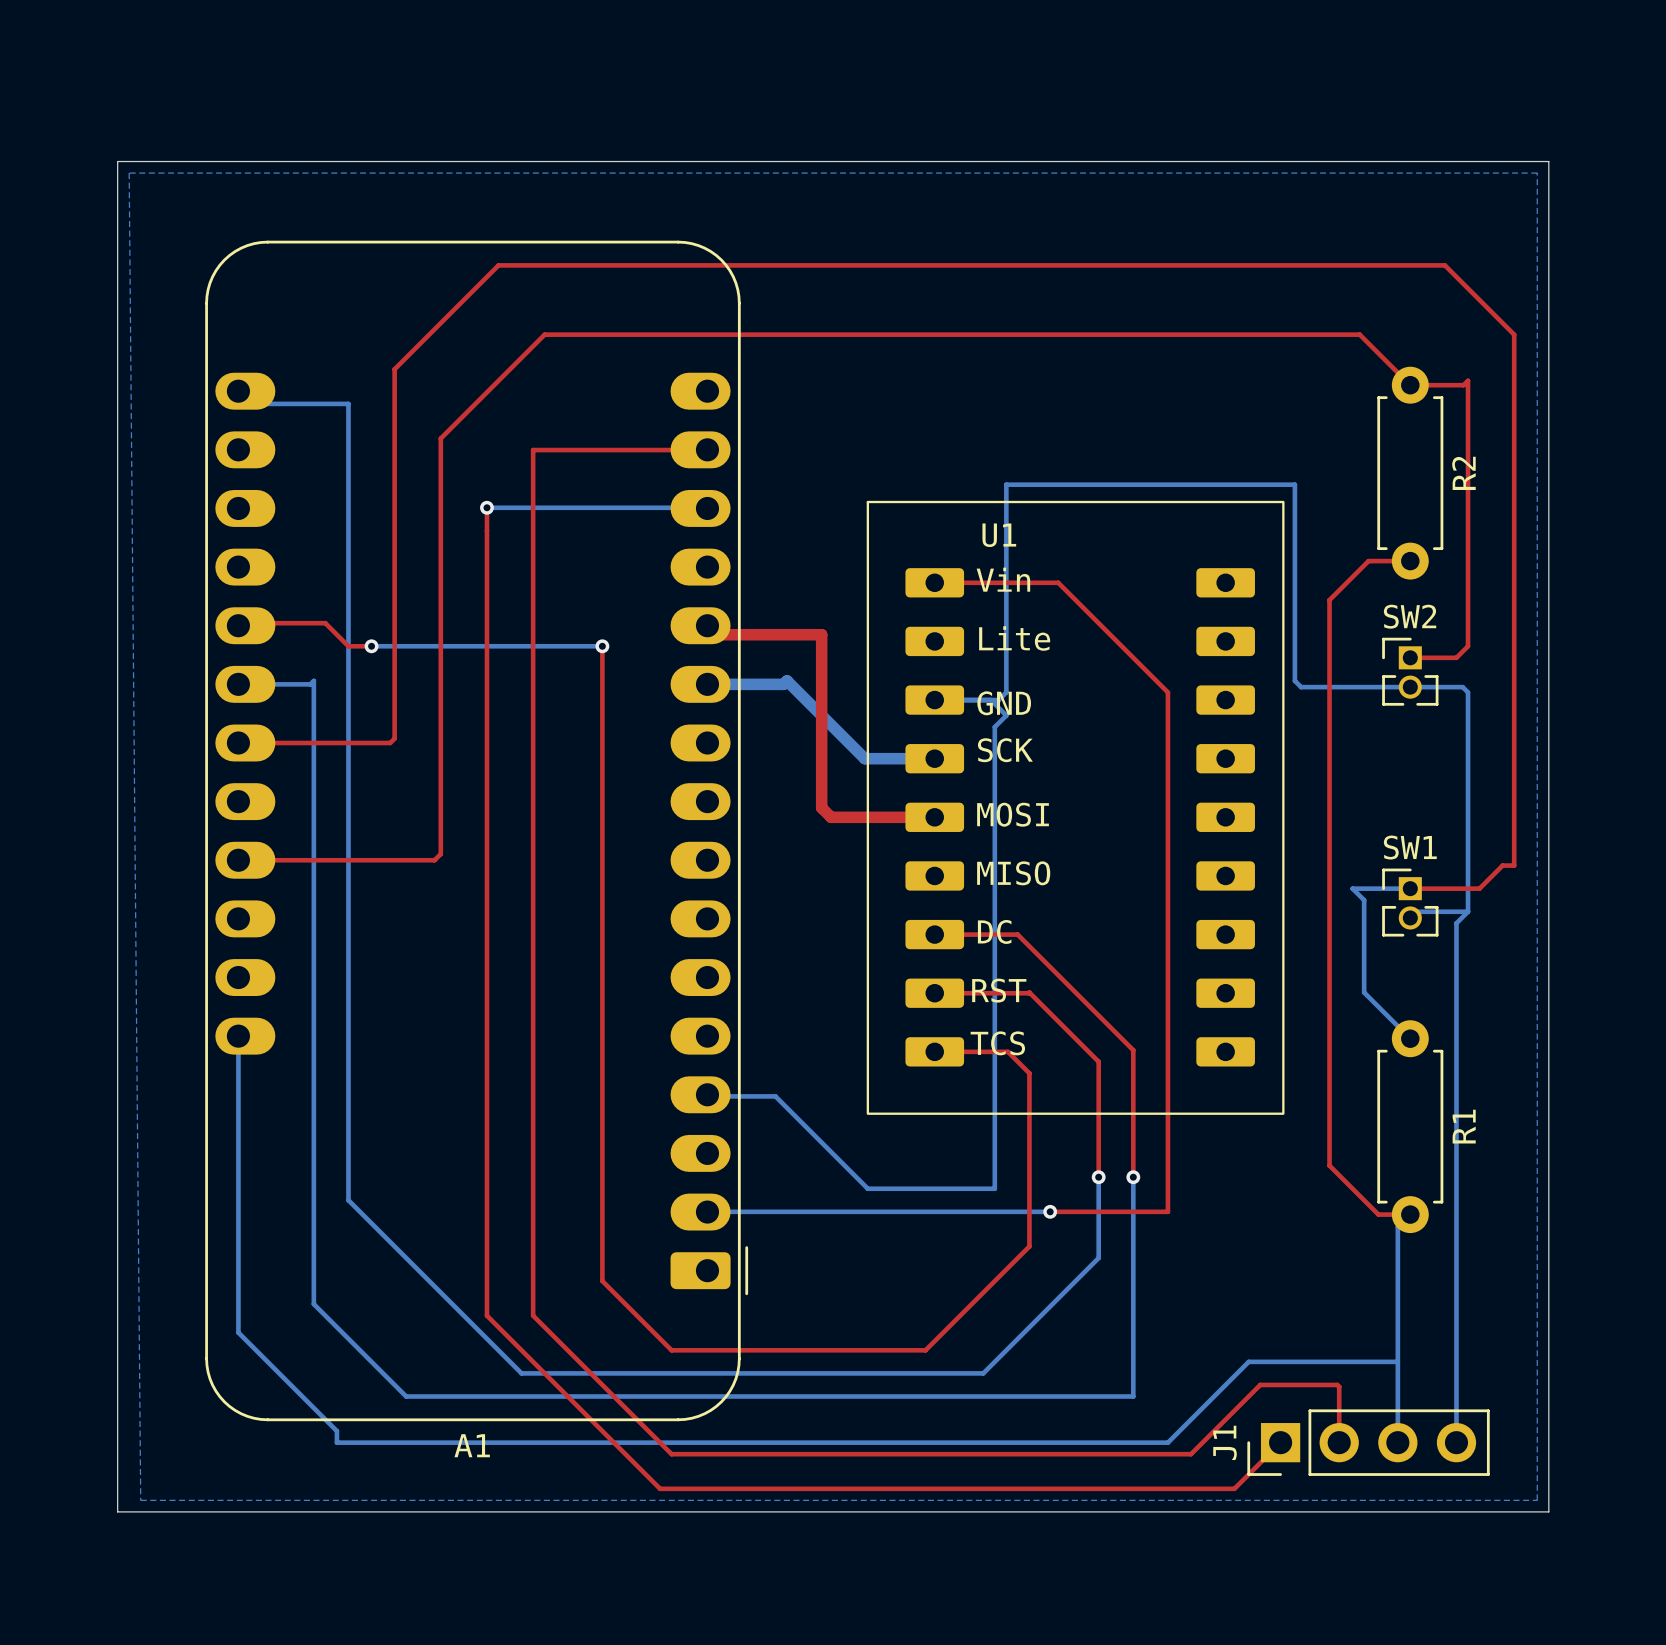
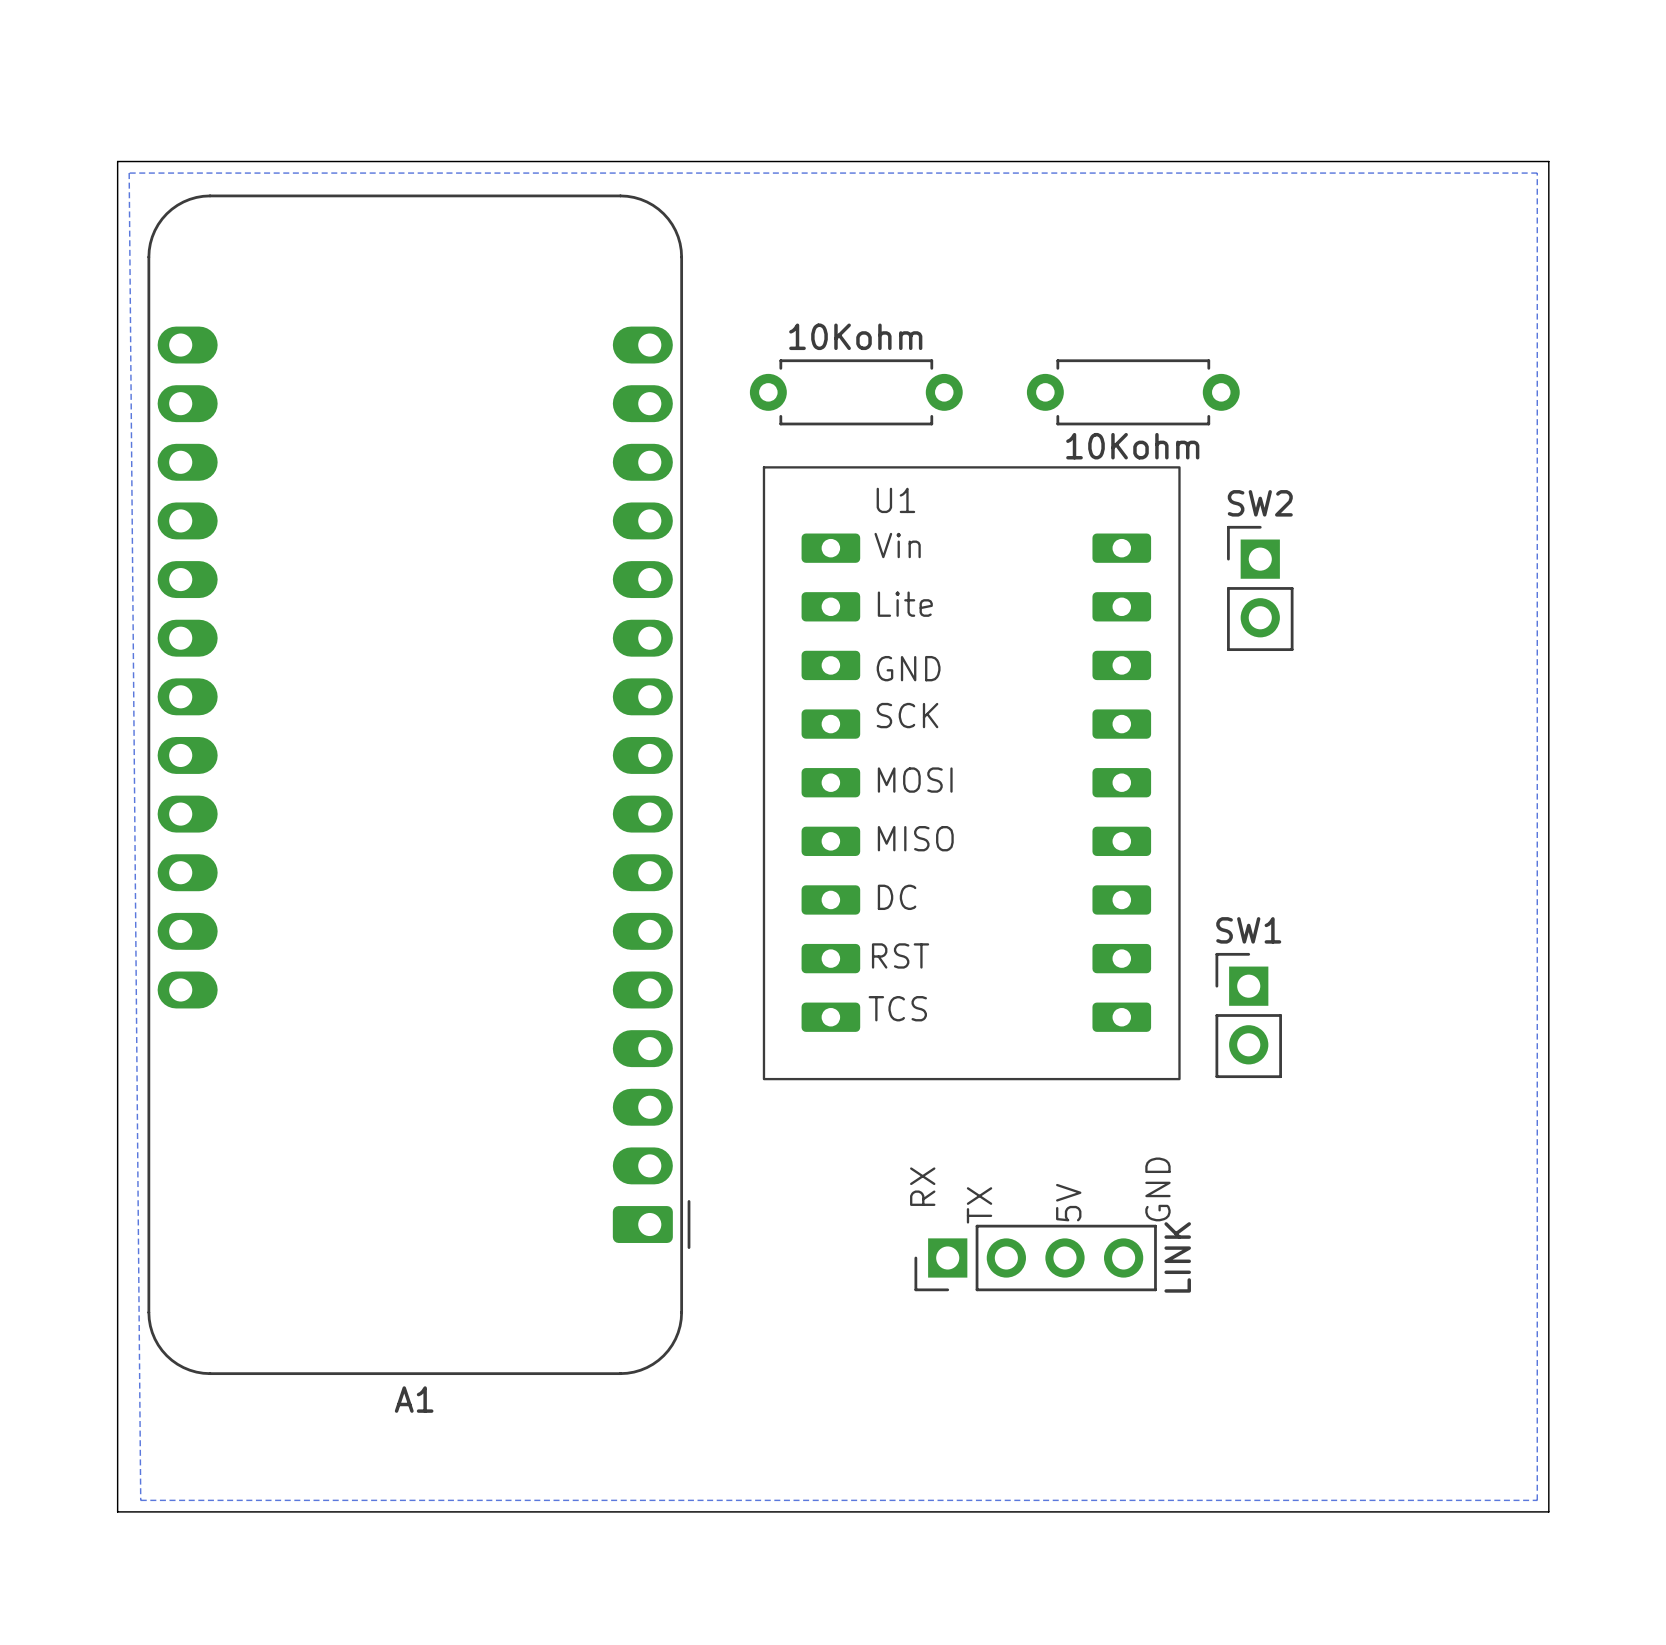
bottom track: (238, 391) (251, 403) (348, 403) (348, 1200) (521, 1373) (983, 1373) (1098, 1257) (1098, 1177) -> none
10Kohm: none -> (856, 392)
10Kohm: none -> (1133, 392)
top track: (707, 450) (533, 450) (533, 1315) (671, 1454) (1191, 1454) (1260, 1384) (1337, 1384) (1339, 1386) (1339, 1442) -> none
R2: (1410, 473) -> none
bottom track: (486, 507) (707, 508) -> none
top track: (486, 507) (486, 1315) (660, 1488) (1234, 1488) (1280, 1442) -> none
via: (486, 507) -> none
top track: (1410, 561) (1368, 561) (1329, 600) (1329, 1165) (1378, 1214) (1407, 1214) (1410, 1211) (1410, 1214) -> none
top track: (934, 582) (1058, 582) (1167, 692) (1167, 1211) (1052, 1211) -> none
top track: (238, 625) (240, 623) (325, 623) (348, 646) (371, 646) -> none
top track: (707, 625) (716, 634) (821, 634) (821, 807) (831, 817) (934, 817) -> none
SW2 footprint: [1382, 637, 1439, 706] -> [1227, 525, 1294, 652]
bottom track: (371, 646) (602, 646) -> none
via: (371, 646) -> none
top track: (602, 646) (602, 1281) (671, 1350) (925, 1350) (1029, 1246) (1029, 1073) (1007, 1051) (934, 1051) -> none
via: (602, 646) -> none
top track: (1410, 657) (1456, 657) (1468, 646) (1468, 380) (1463, 385) (1410, 385) (1359, 334) (544, 334) (440, 438) (440, 854) (434, 860) (238, 860) -> none
bottom track: (238, 684) (310, 684) (313, 680) (313, 1304) (406, 1396) (1133, 1396) (1133, 1177) -> none
bottom track: (707, 684) (783, 684) (787, 680) (864, 758) (934, 758) -> none
bottom track: (934, 700) (998, 700) (1006, 692) (1006, 484) (1294, 484) (1294, 680) (1301, 687) (1462, 687) (1468, 692) (1468, 911) -> none
bottom track: (990, 700) (1006, 715) (994, 727) (994, 1188) (867, 1188) (775, 1096) (709, 1096) (707, 1094) -> none
top track: (238, 742) (390, 742) (394, 738) (394, 369) (498, 265) (1444, 265) (1514, 334) (1514, 865) (1502, 865) (1479, 888) (1410, 888) -> none
U1 position: (1075, 807) -> (971, 773)
A1 position: (476, 830) -> (418, 784)
SW1 footprint: [1382, 868, 1439, 937] -> [1215, 952, 1282, 1079]
bottom track: (1410, 888) (1352, 888) (1364, 900) (1364, 992) (1410, 1038) -> none
bottom track: (1468, 911) (1456, 923) (1456, 1442) -> none
bottom track: (1468, 911) (1416, 911) (1410, 917) -> none
top track: (934, 934) (1017, 934) (1133, 1050) (1133, 1177) -> none
top track: (934, 993) (1029, 992) (1098, 1061) (1098, 1177) -> none
bottom track: (238, 1036) (238, 1332) (336, 1431) (336, 1442) (1167, 1442) (1248, 1361) (1397, 1361) -> none
R1: (1410, 1126) -> none
via: (1098, 1177) -> none
via: (1133, 1177) -> none
text: none -> RX (922, 1186)
text: none -> GND (1157, 1189)
text: none -> TX (979, 1205)
text: none -> 5V (1068, 1202)
bottom track: (707, 1211) (1050, 1211) -> none
via: (1050, 1211) -> none
bottom track: (1410, 1214) (1397, 1227) (1397, 1442) -> none
part: none -> LINK (1035, 1257)
J1: (1368, 1442) -> none

